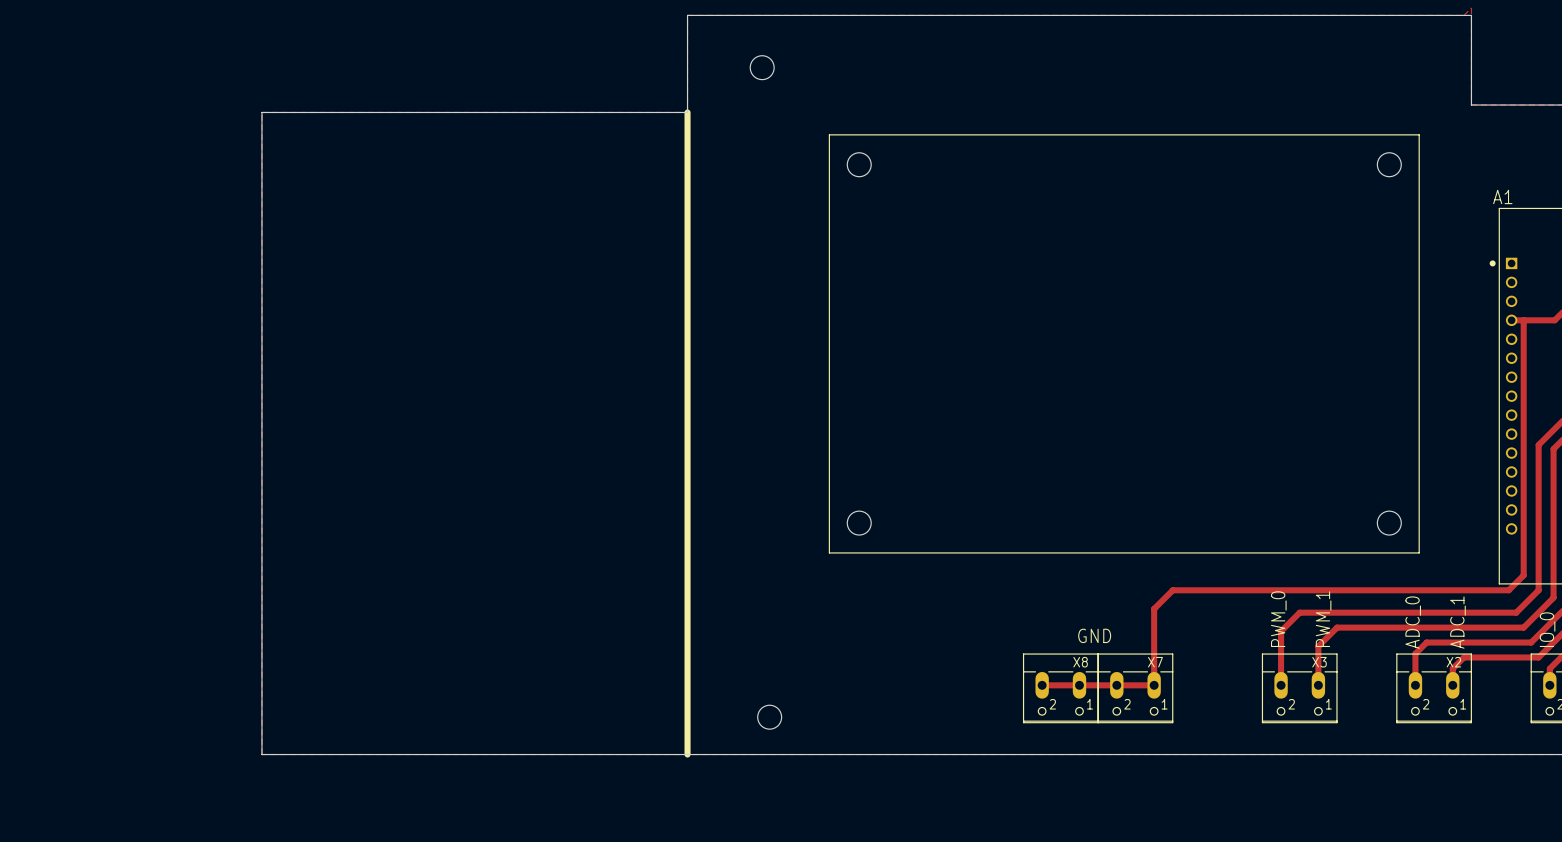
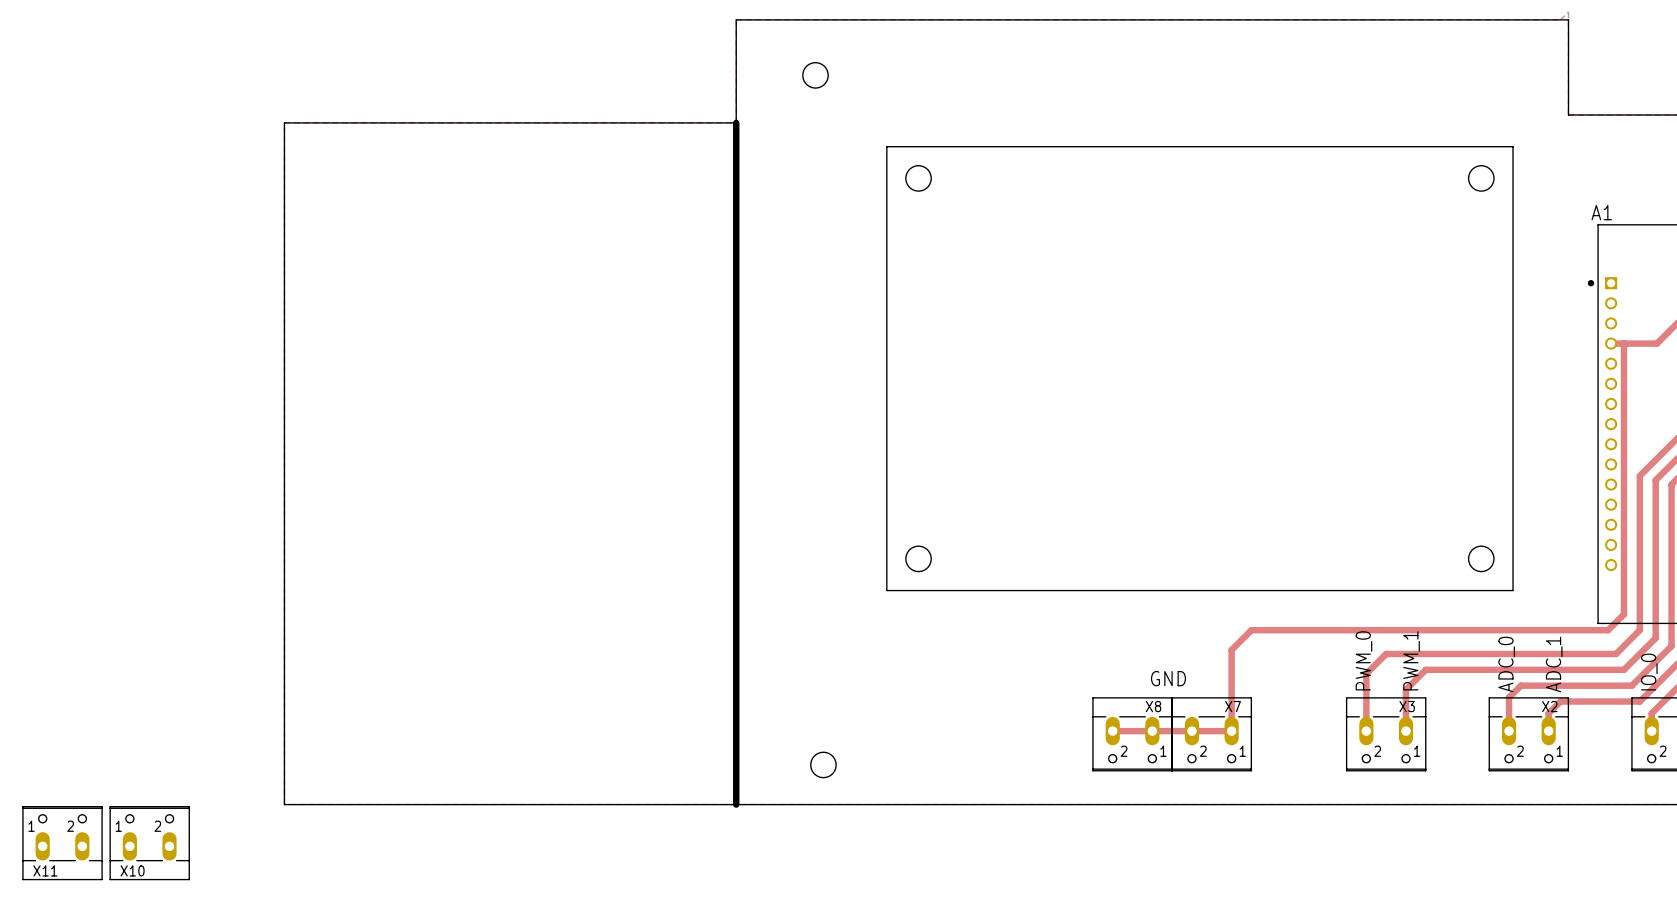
X11: none -> (62, 843)
X10: none -> (149, 843)

